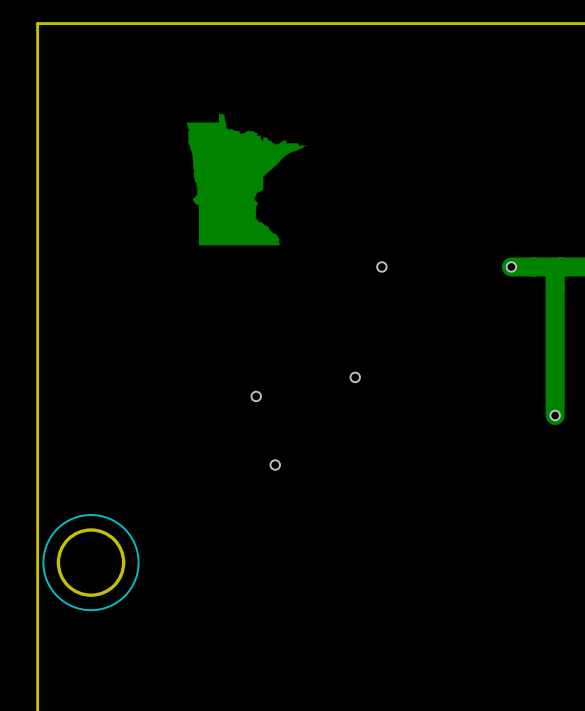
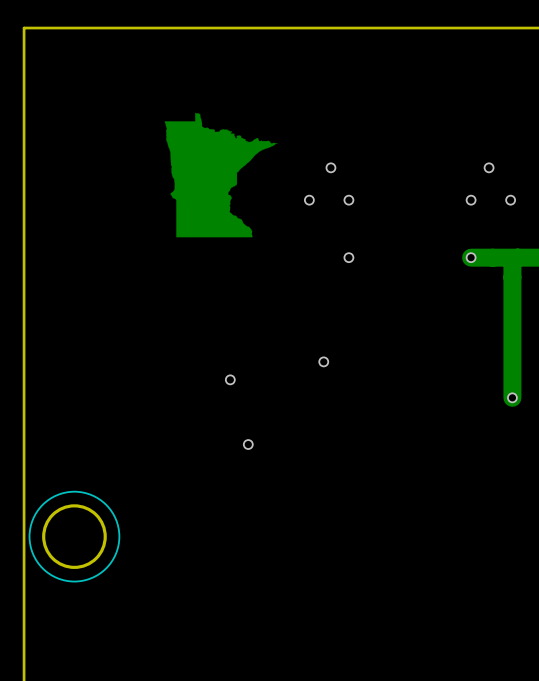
via: none -> (330, 167)
via: none -> (489, 167)
via: none -> (309, 200)
via: none -> (348, 200)
via: none -> (471, 200)
via: none -> (510, 200)

